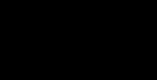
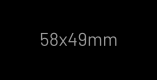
text: none -> 58x49mm (78, 39)

